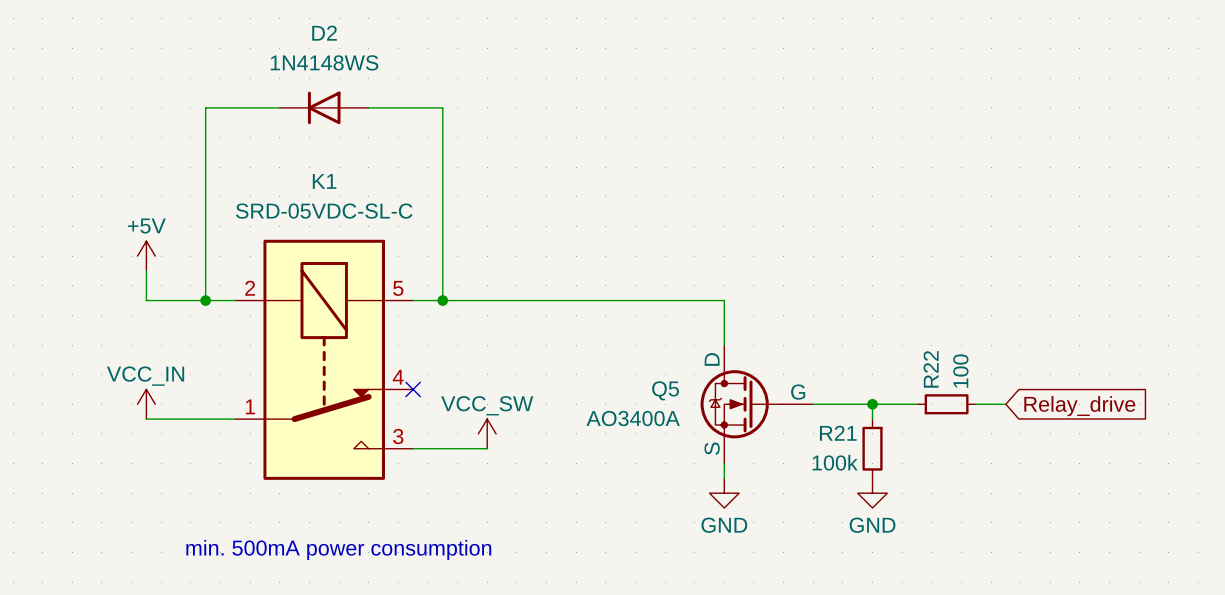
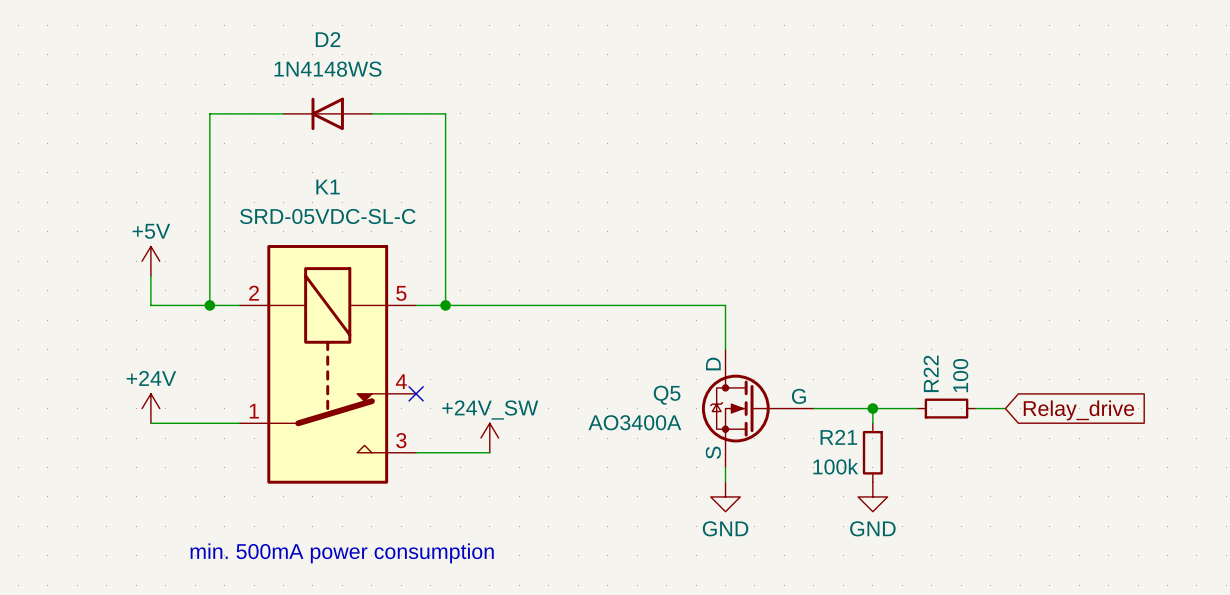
power symbol: VCC_IN (146, 404) -> +24V (150, 408)
power symbol: VCC_SW (487, 433) -> +24V_SW (489, 438)

